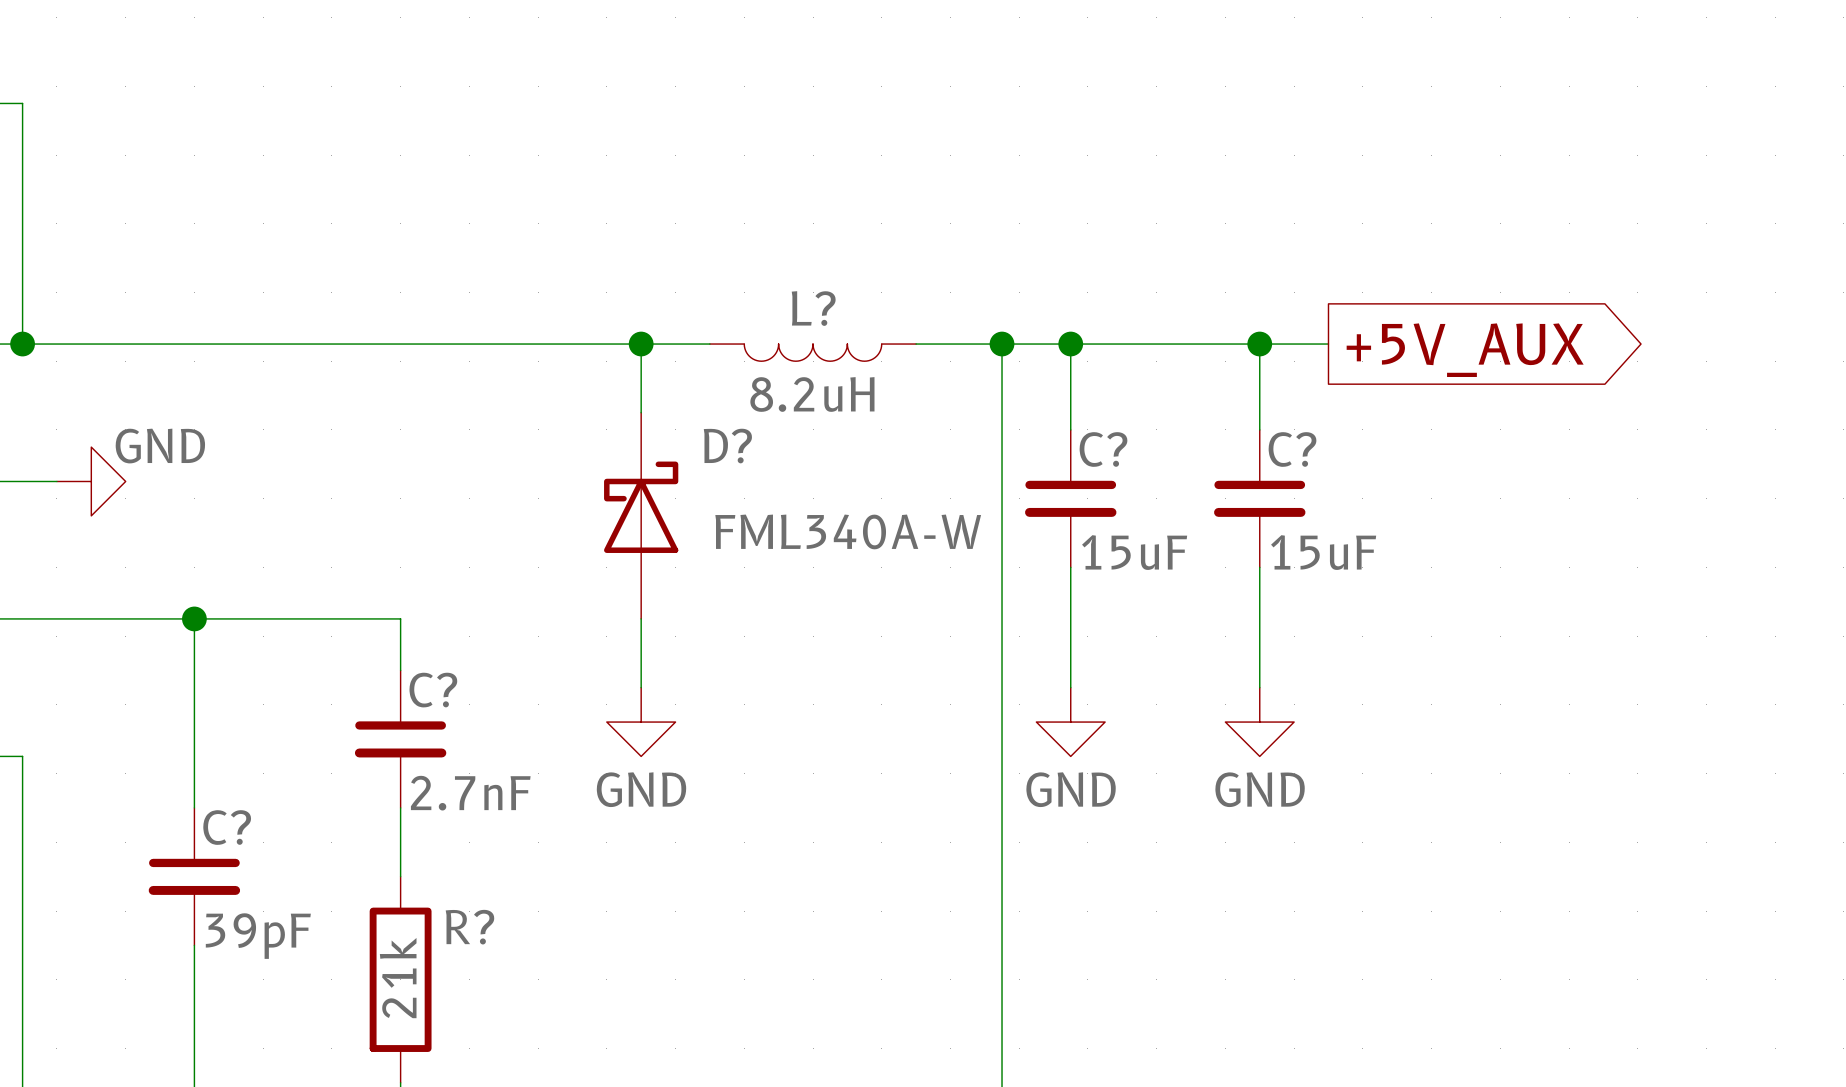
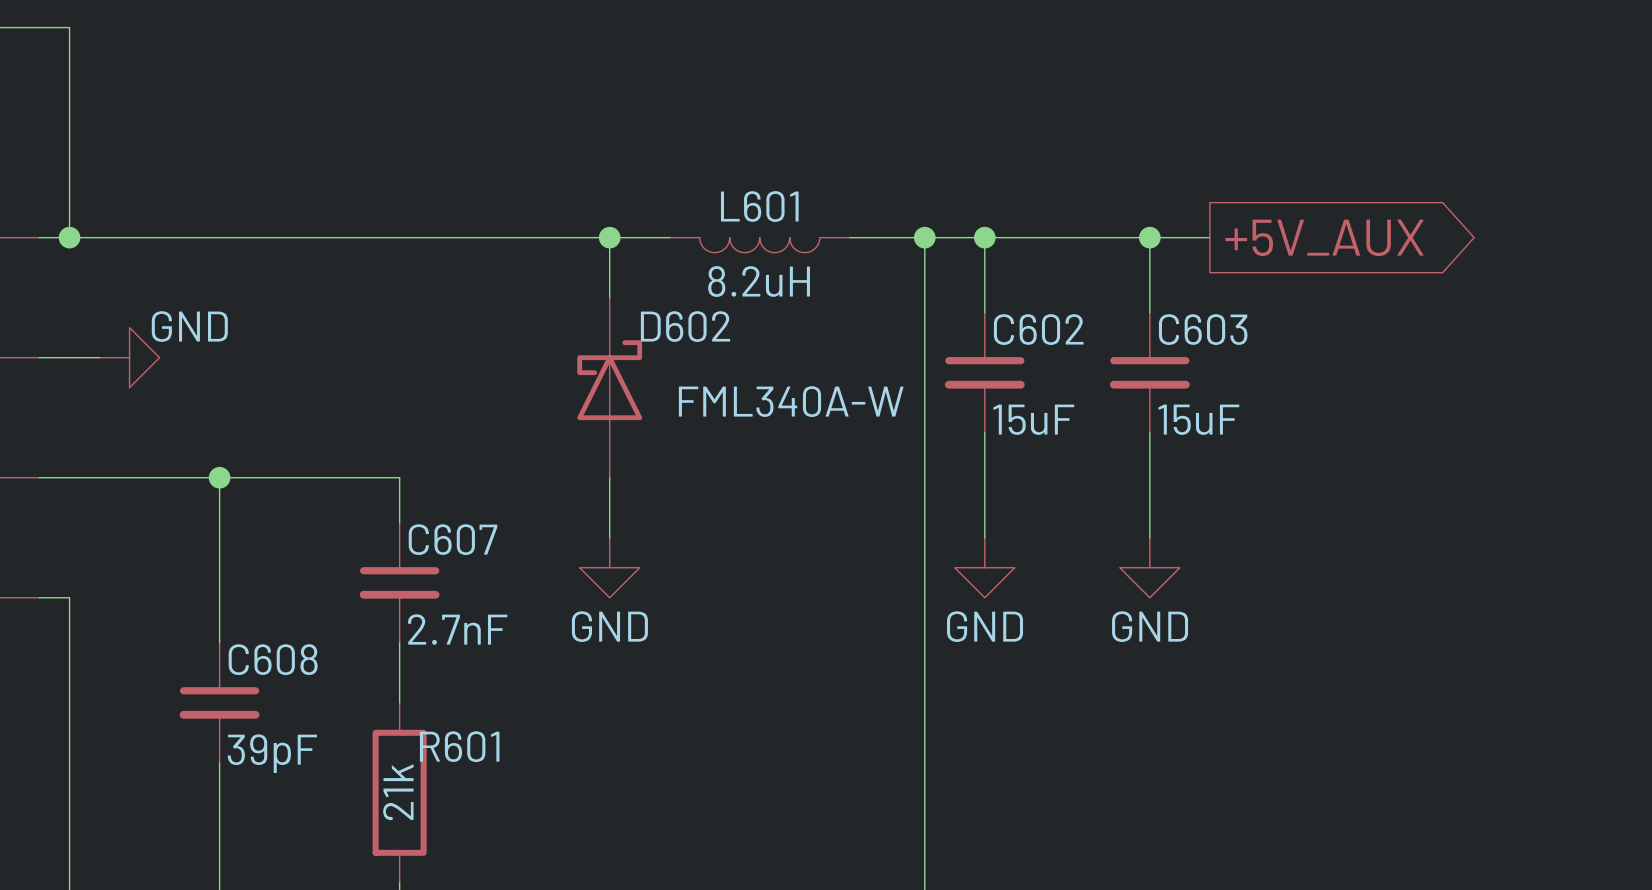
L? name: L? (813, 308) -> L601 (759, 206)
D? name: D? (727, 446) -> D602 (685, 326)
C? name: C? (1103, 449) -> C602 (1038, 329)
C? name: C? (1292, 449) -> C603 (1203, 329)
C? name: C? (433, 690) -> C607 (453, 539)
C? name: C? (227, 827) -> C608 (273, 659)
R? name: R? (469, 927) -> R601 (459, 746)

